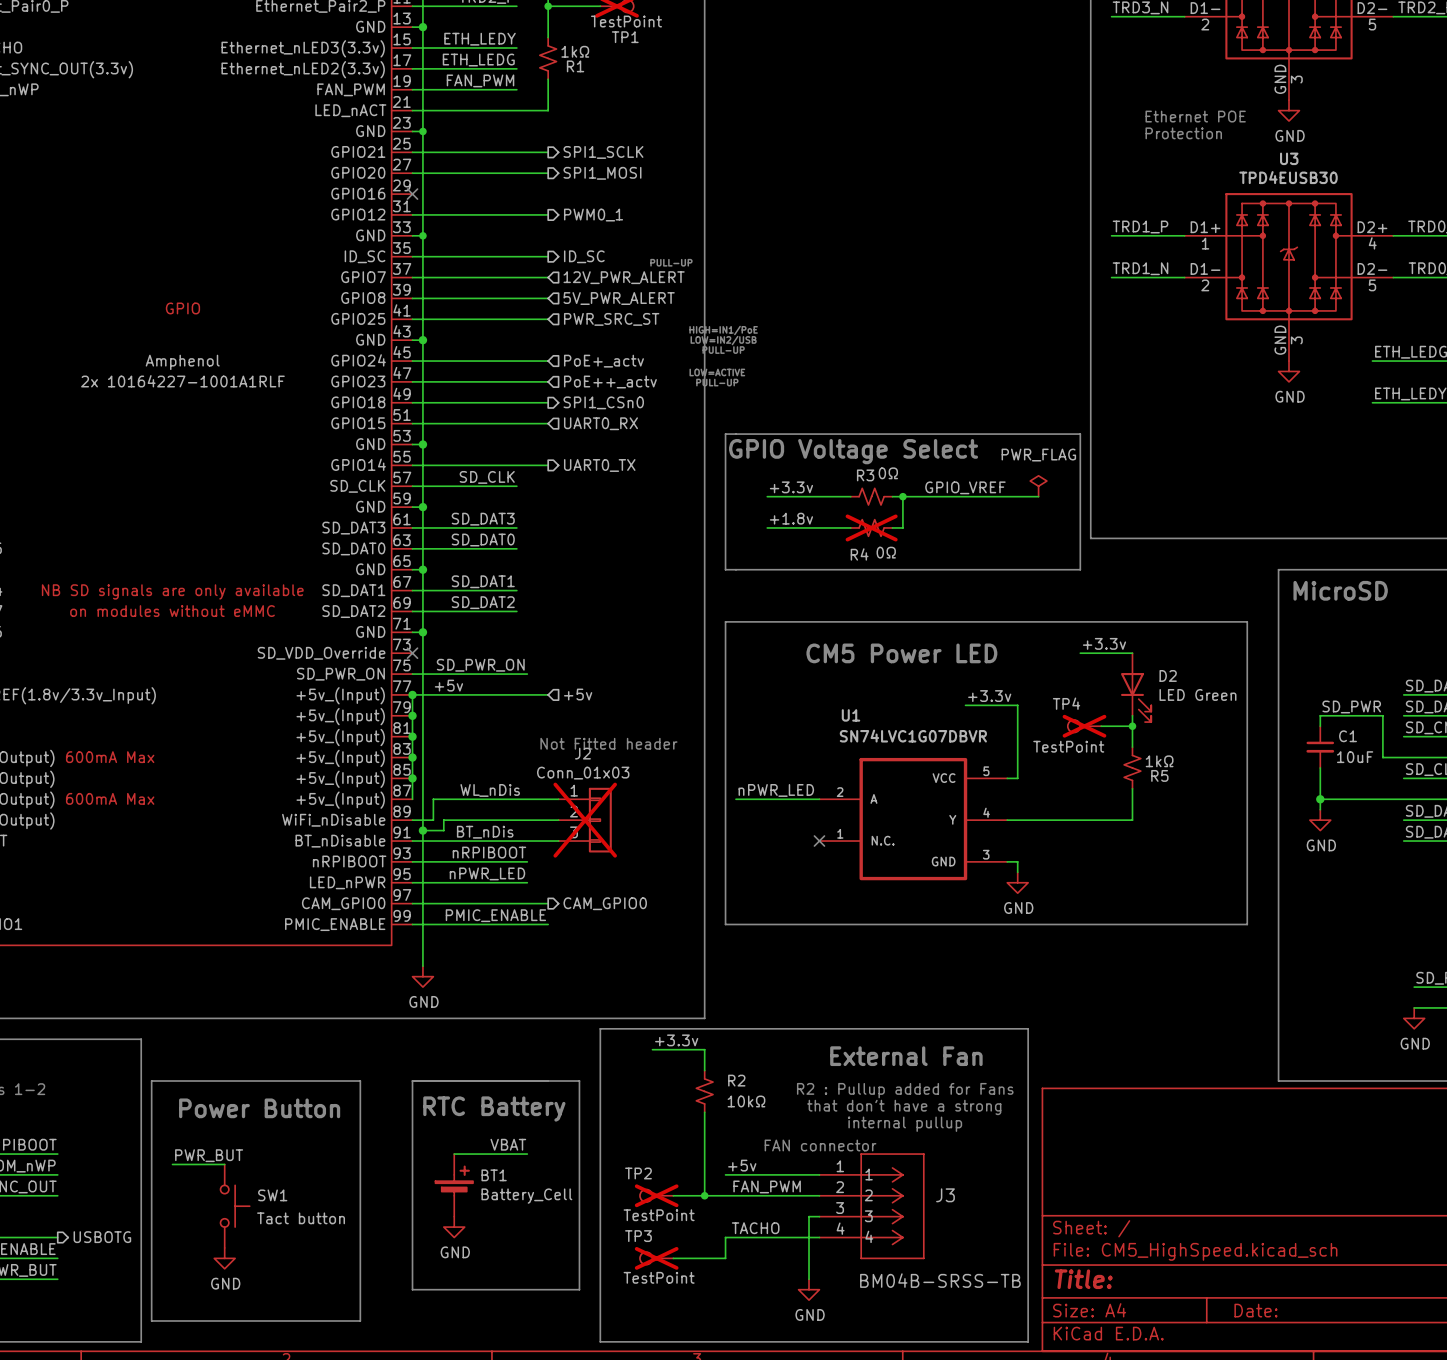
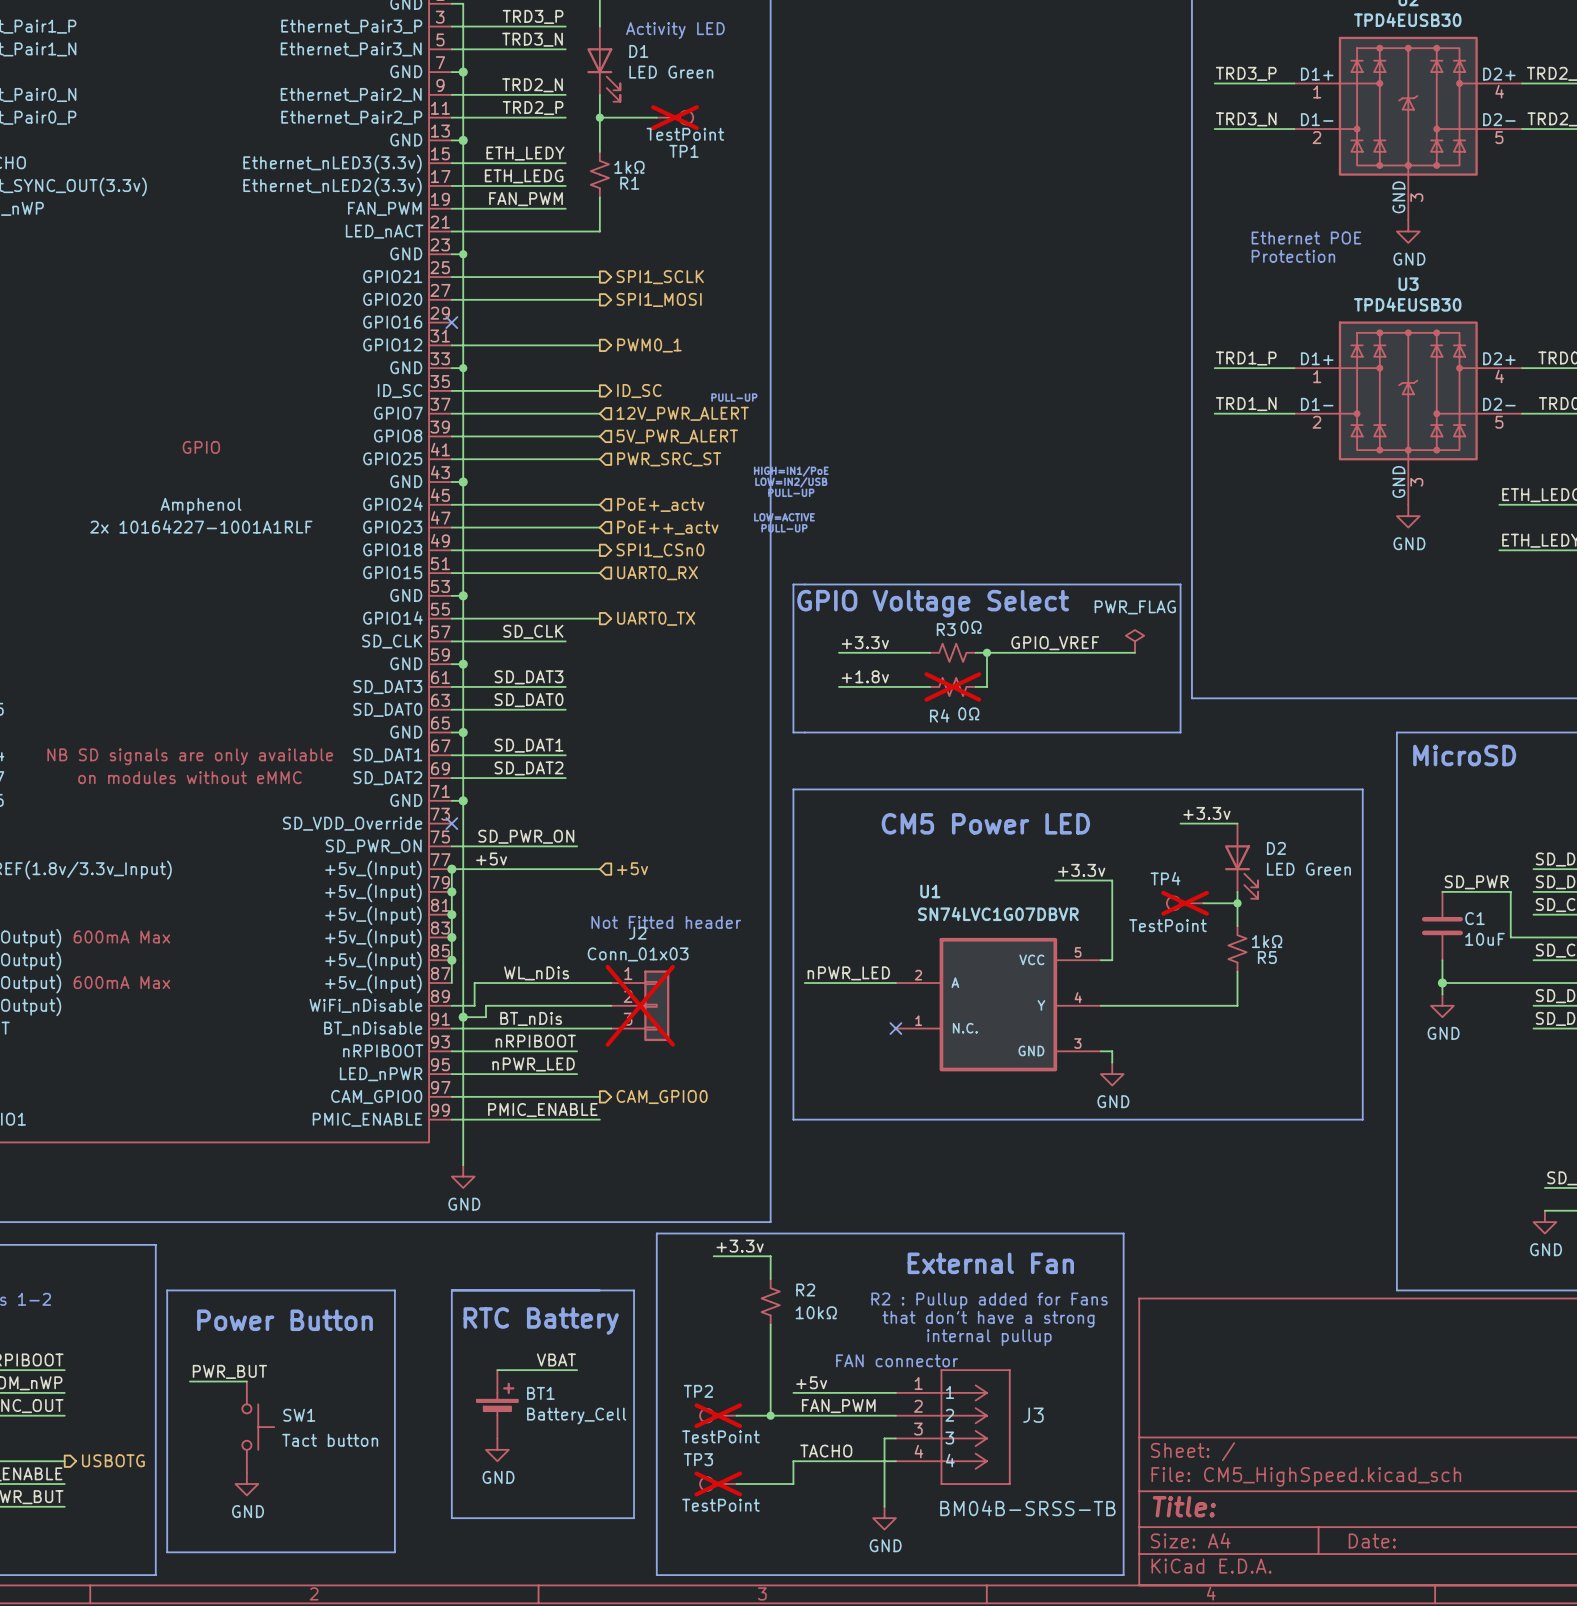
C1 symbol: [1306, 726, 1335, 768] -> [1421, 891, 1463, 961]

